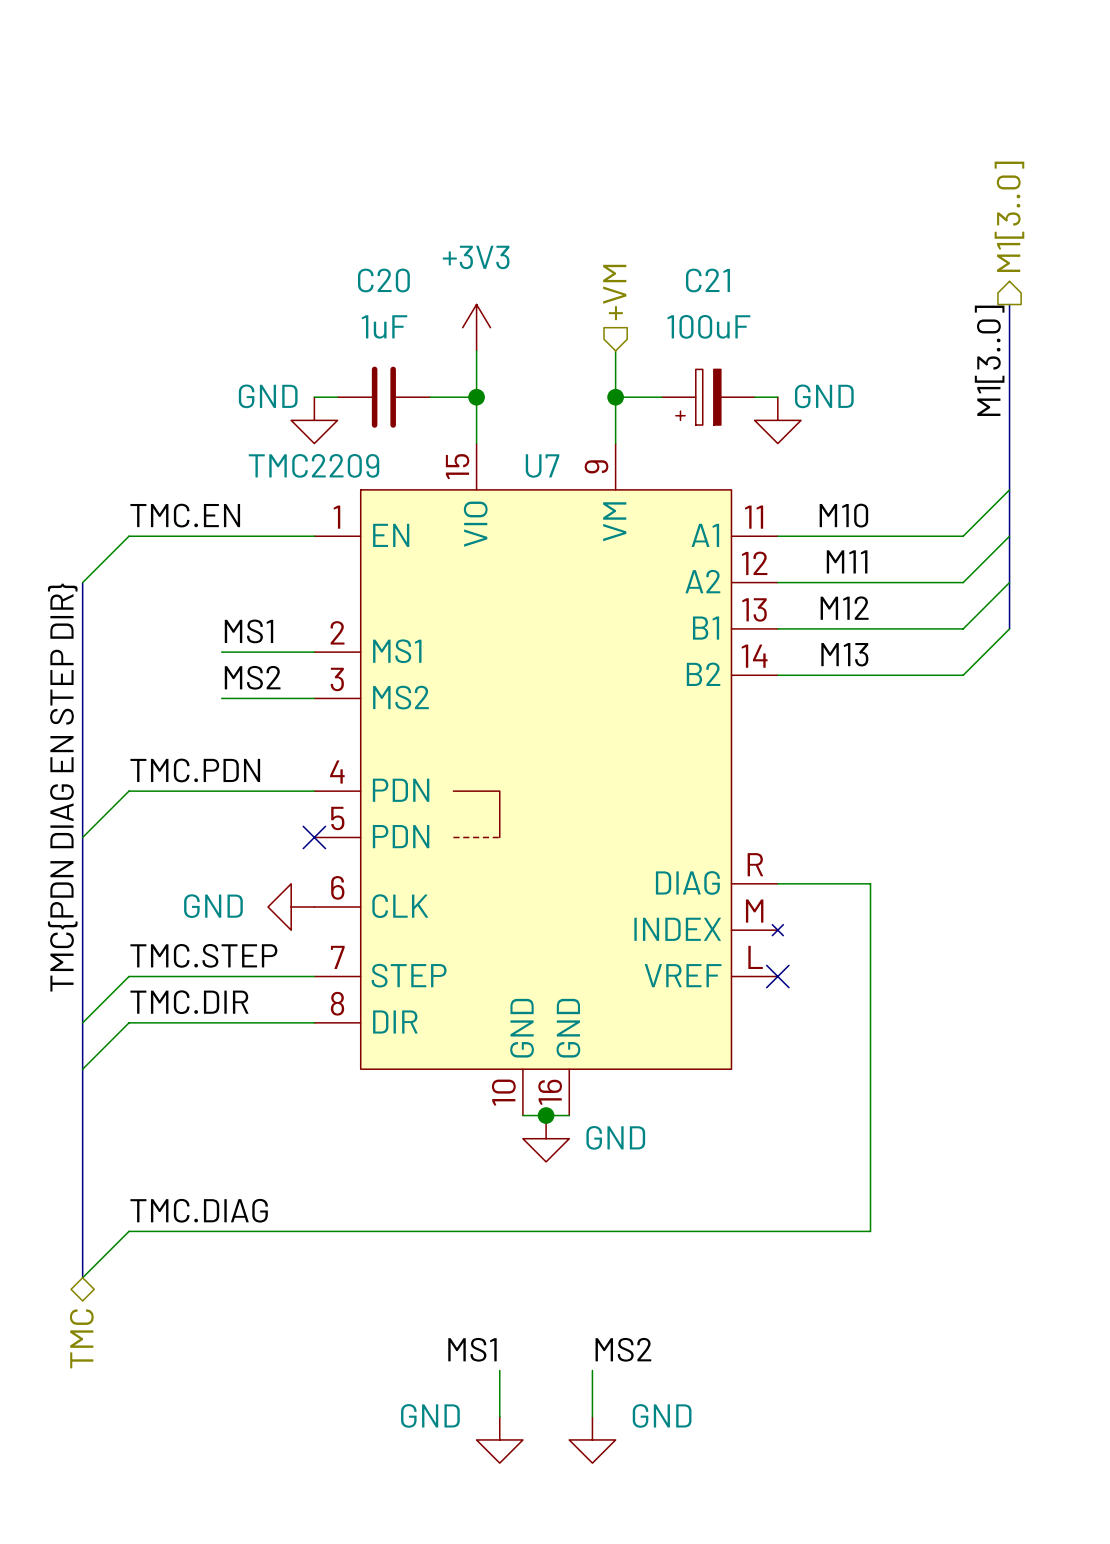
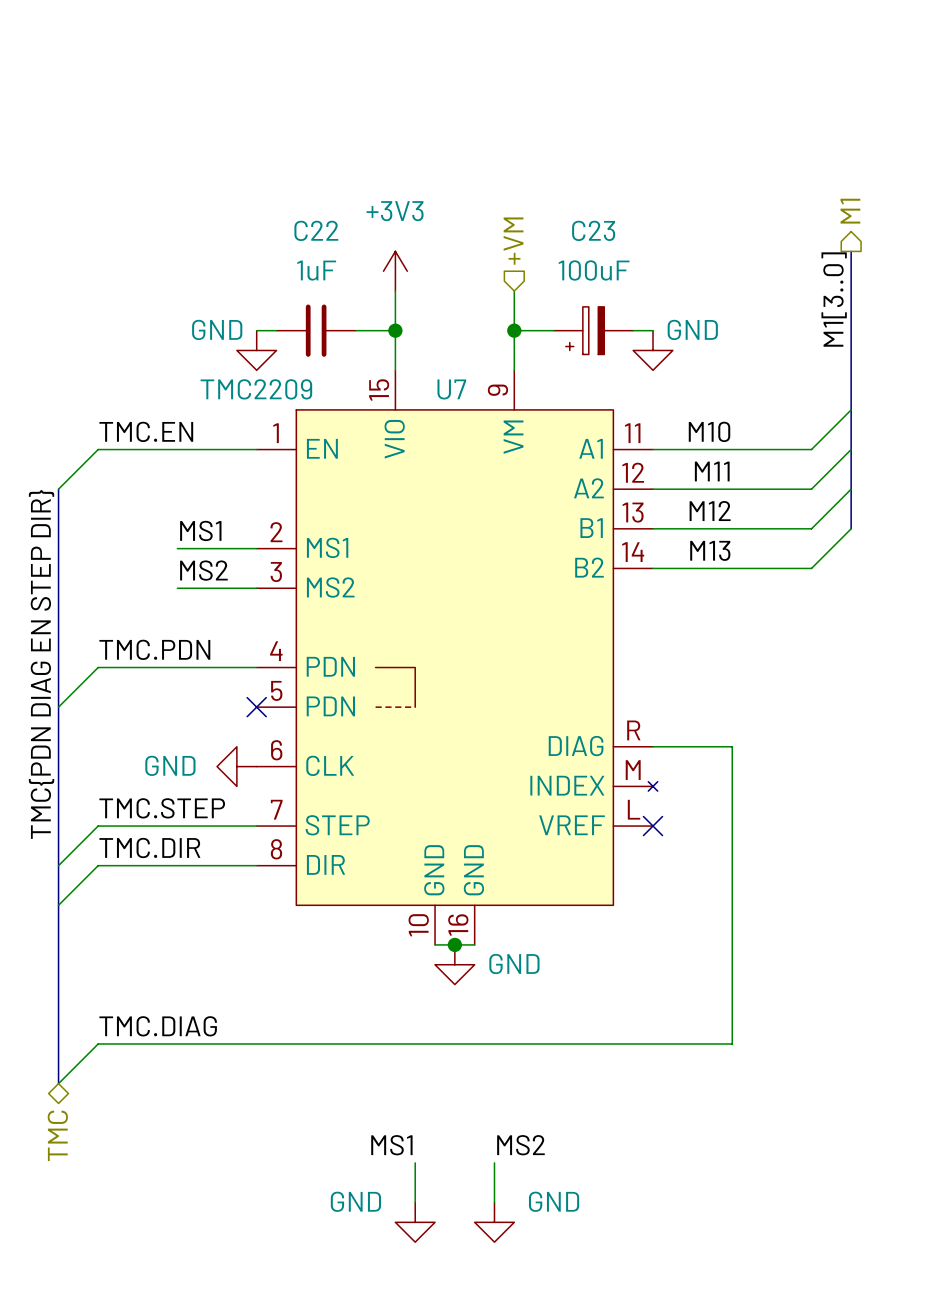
hierarchical label: M1[3..0] (1009, 216) -> M1 (850, 211)
C20 name: C20 (383, 280) -> C22 (316, 230)
C21 name: C21 (707, 280) -> C23 (593, 230)

